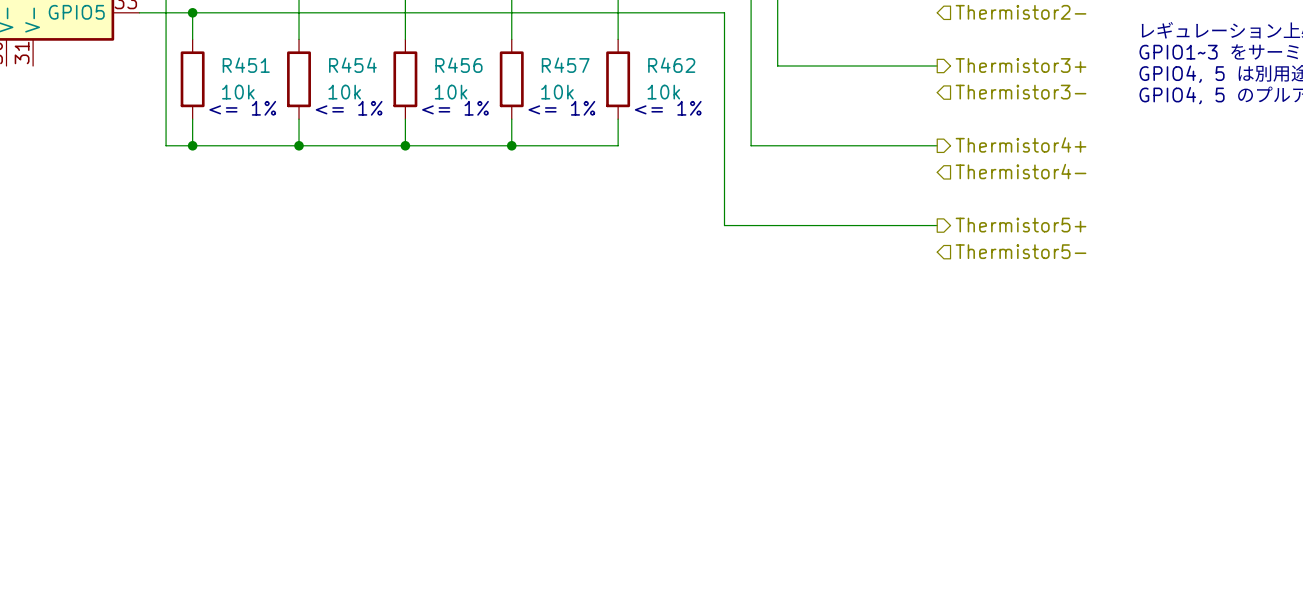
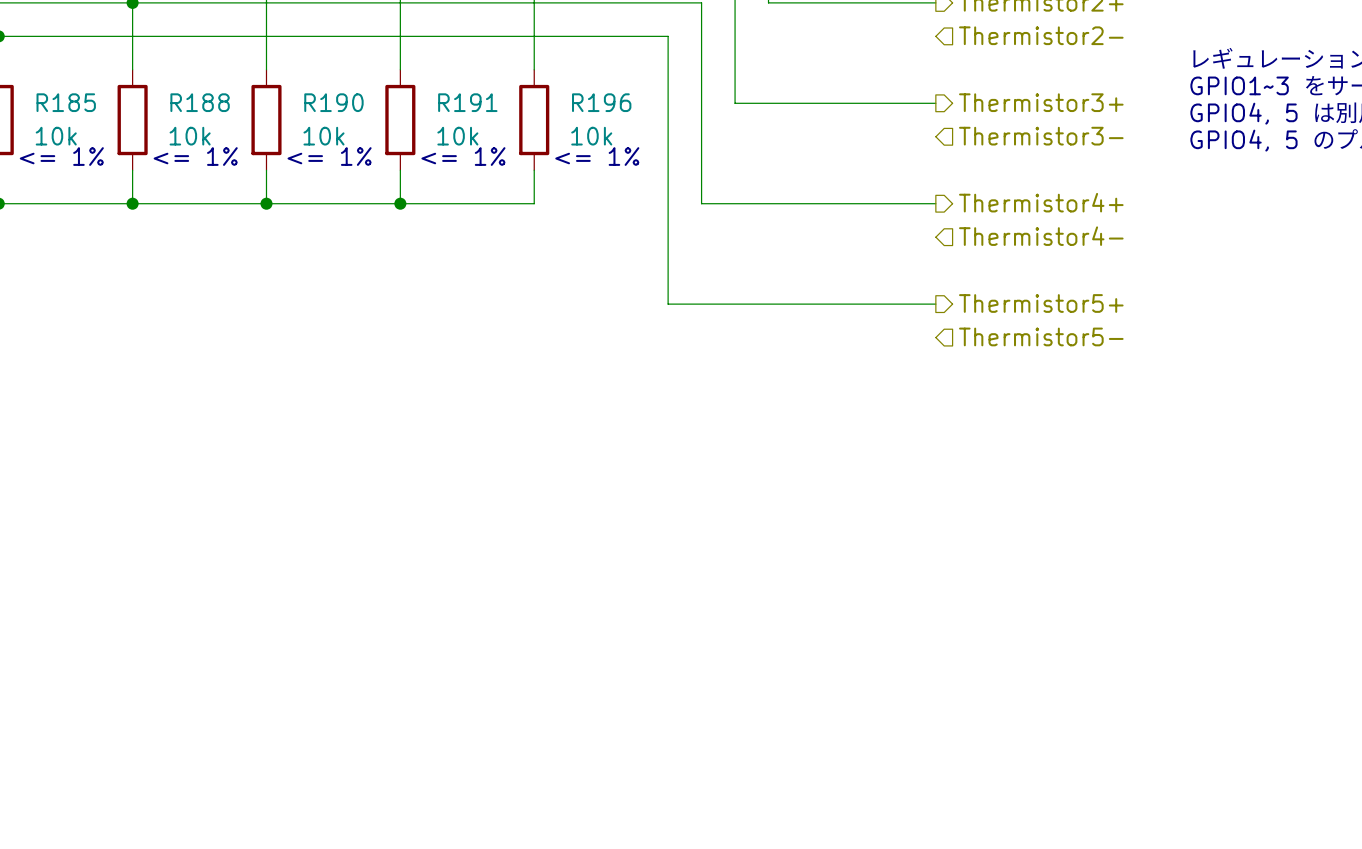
R451 name: R451 (246, 65) -> R185 (66, 102)
R454 name: R454 (352, 65) -> R188 (200, 102)
R456 name: R456 (458, 65) -> R190 (333, 102)
R457 name: R457 (565, 65) -> R191 (467, 102)
R462 name: R462 (671, 65) -> R196 (601, 102)

